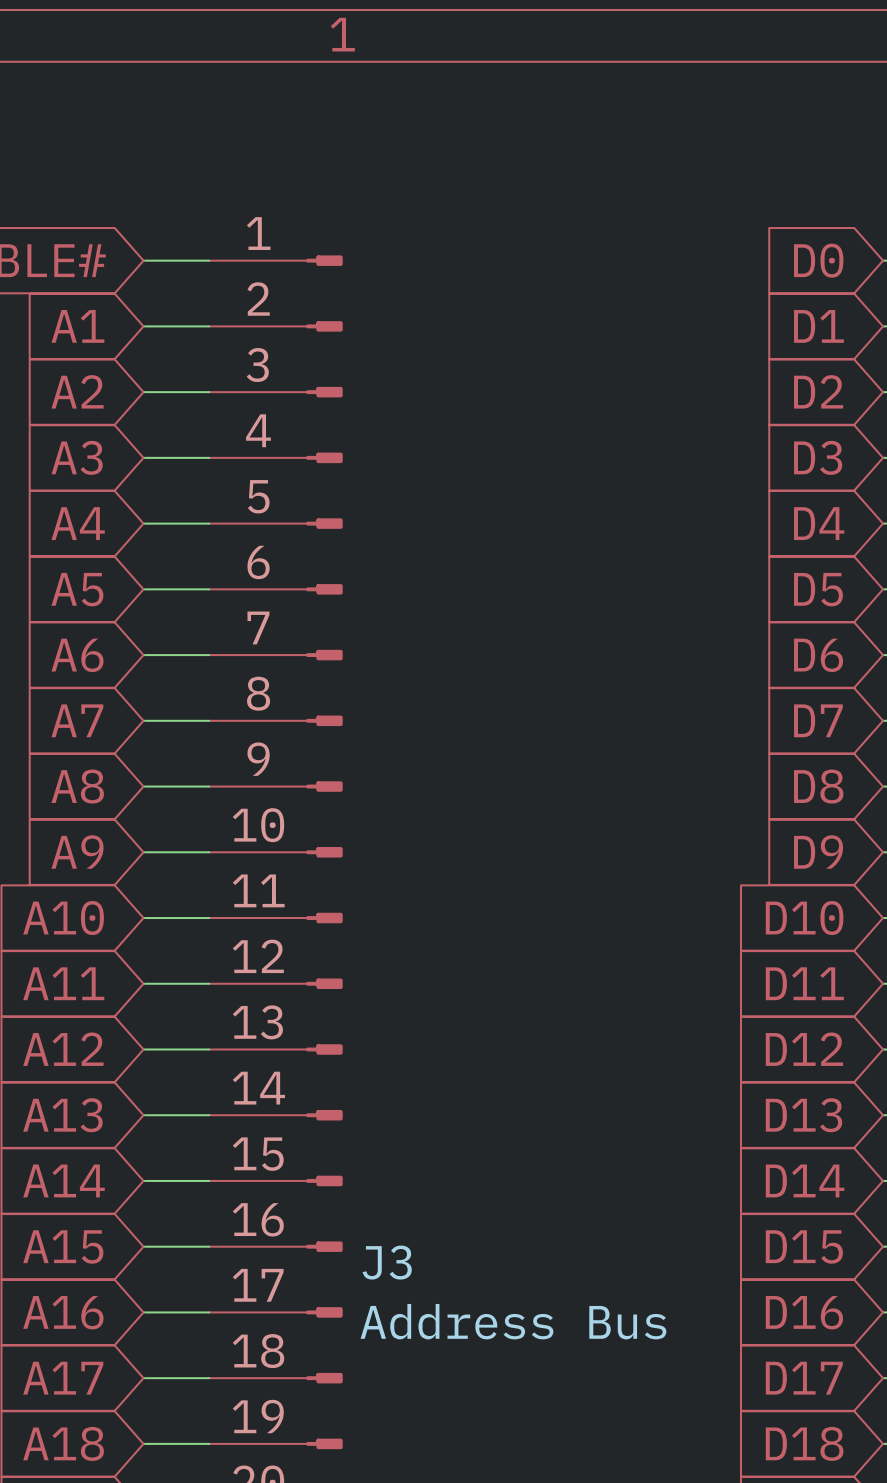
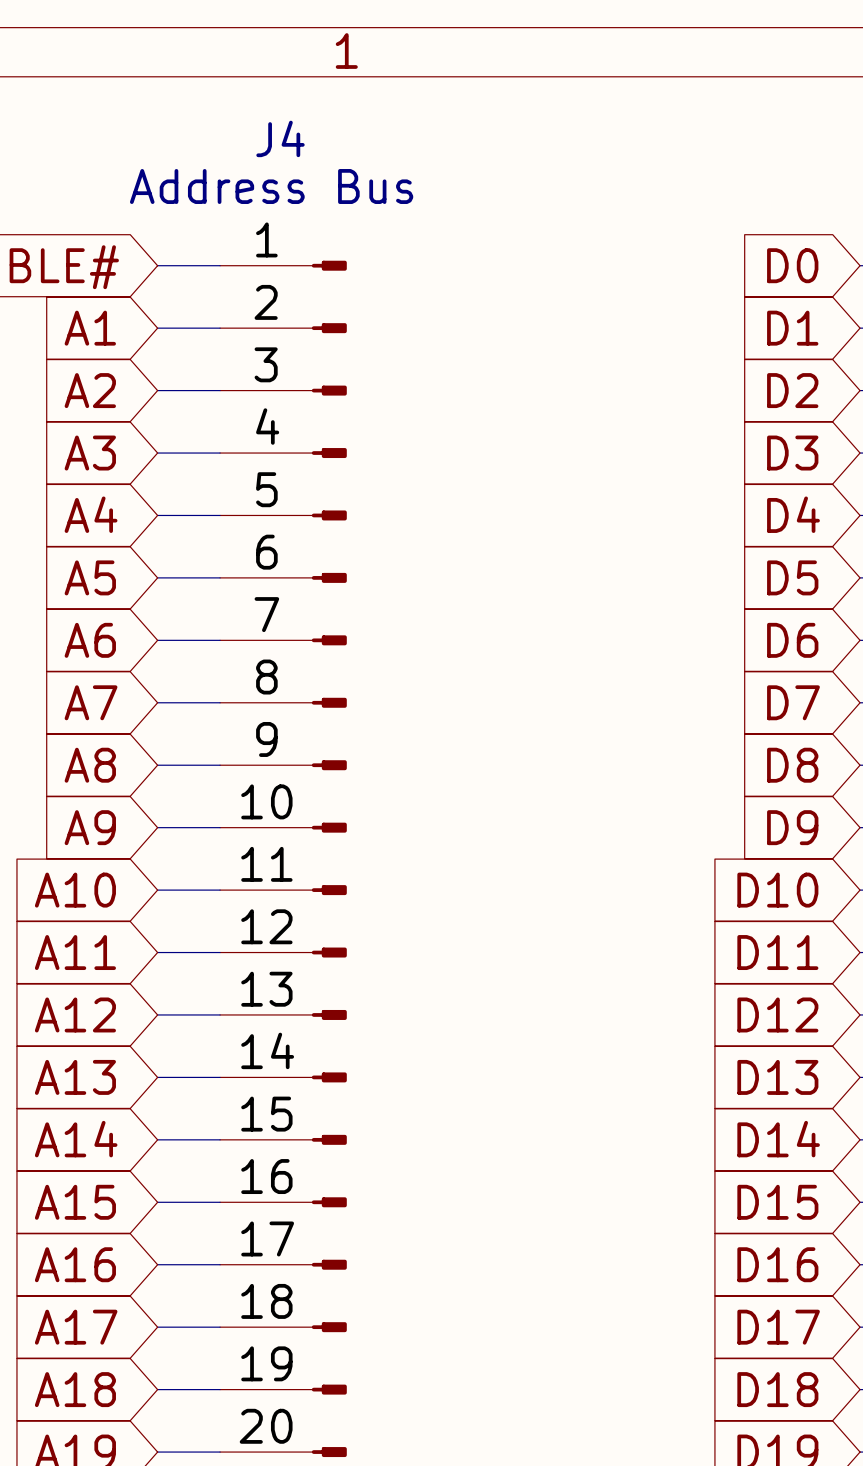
J3 name: J3 (387, 1262) -> J4 (280, 138)
J3 value position: Address Bus (513, 1321) -> Address Bus (271, 186)

